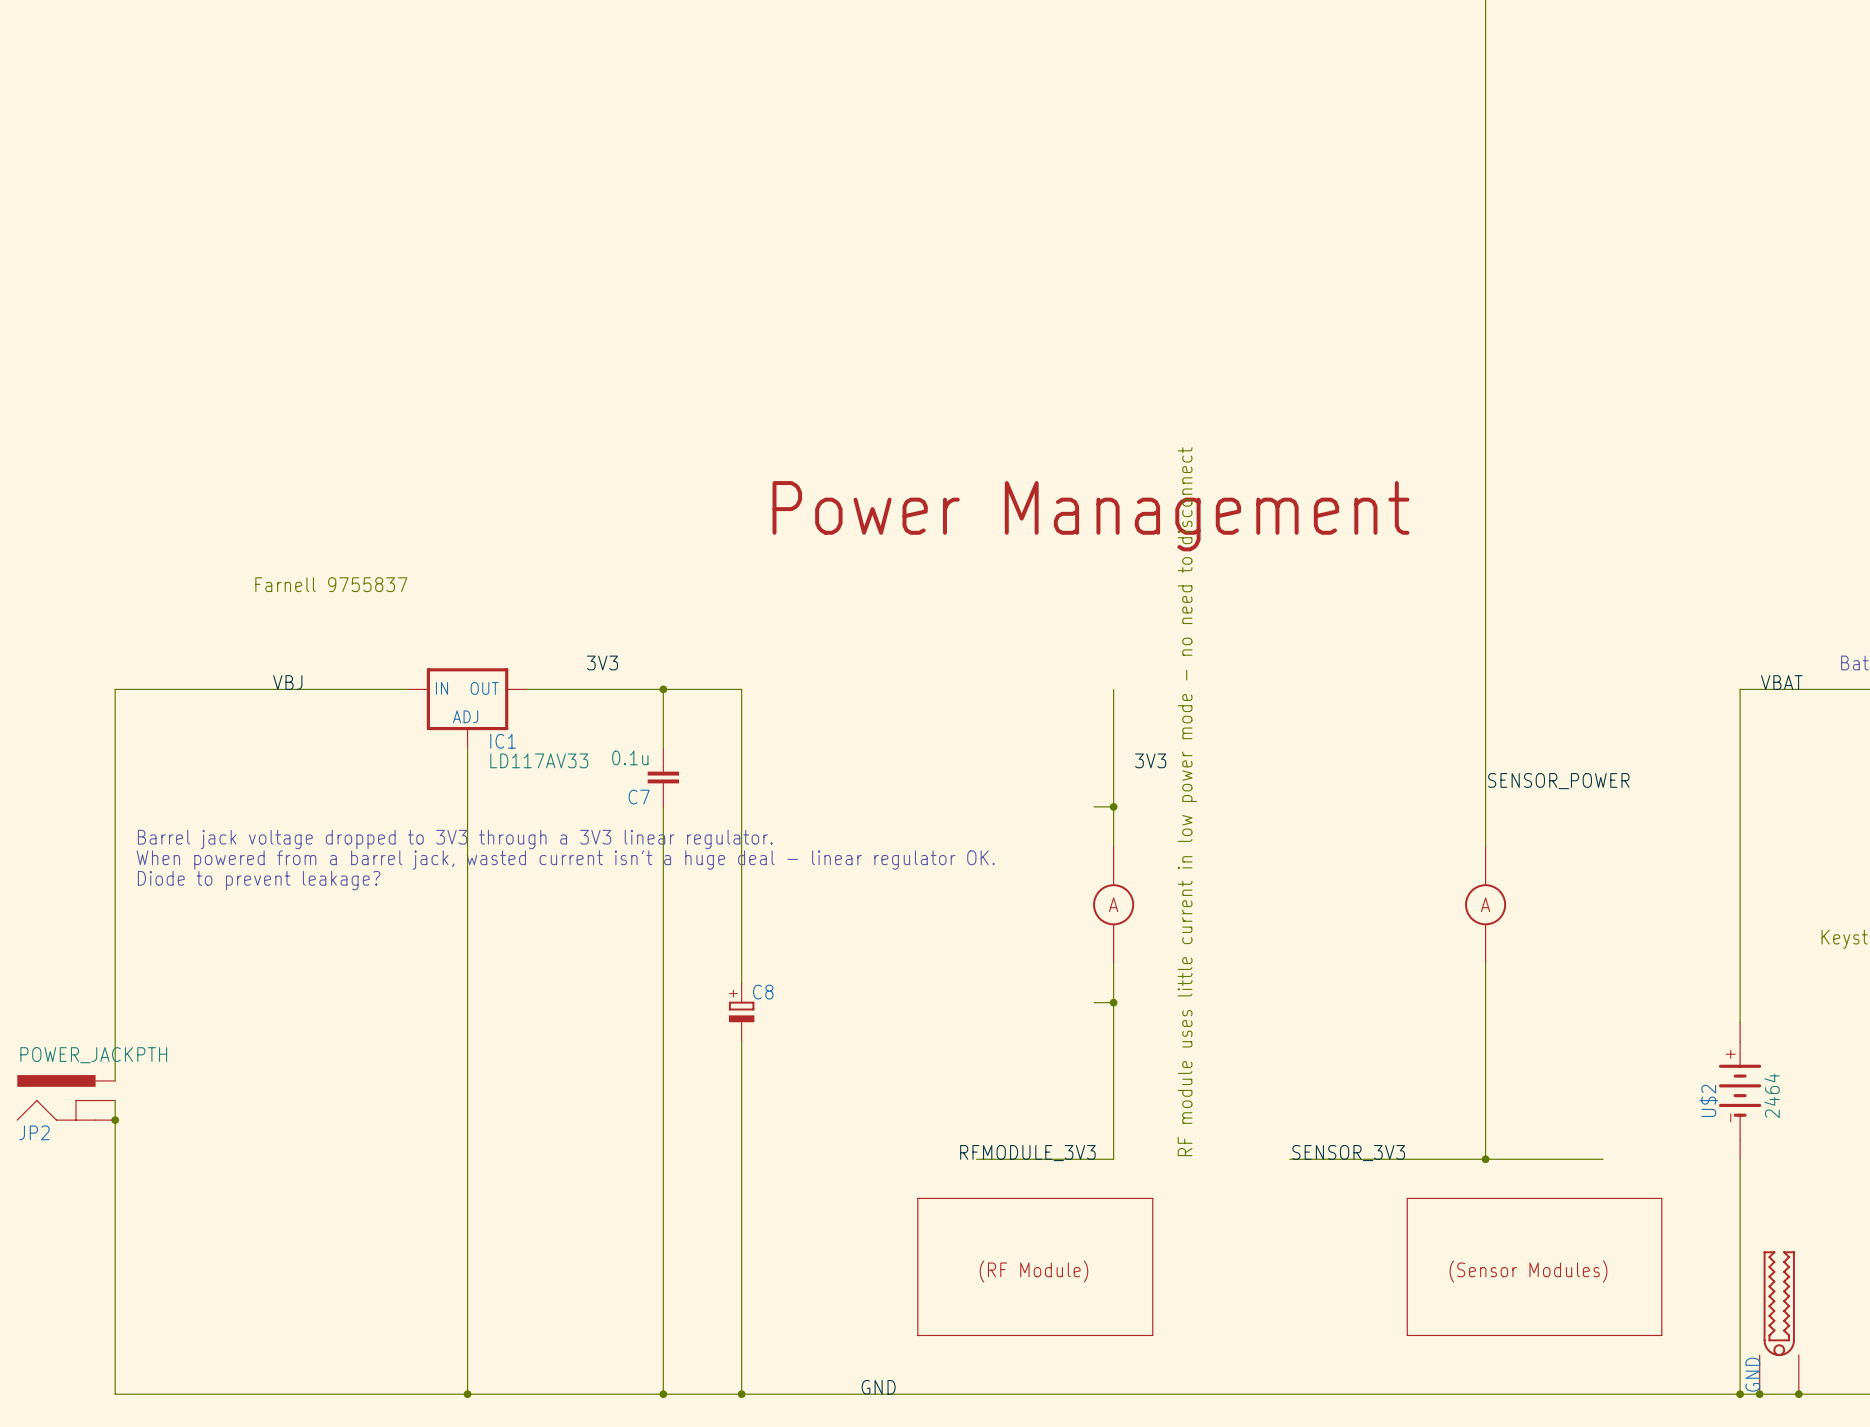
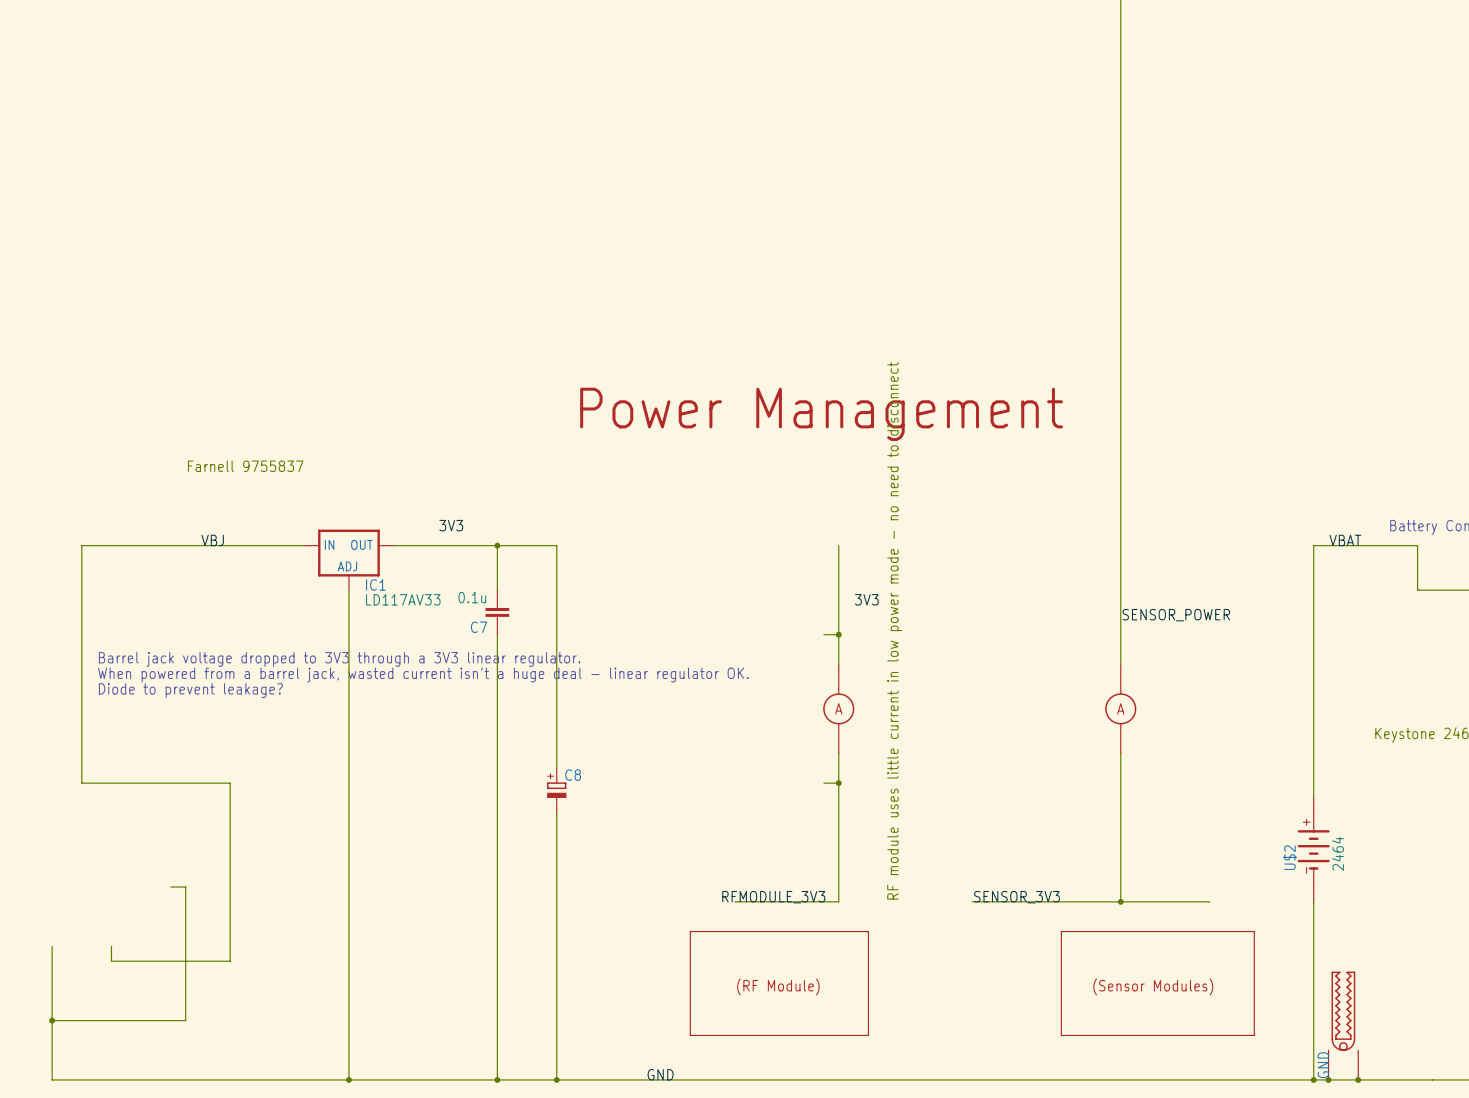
wire: (115, 1002) (115, 1080) -> (81, 783) (230, 783) (230, 961) (111, 961) (111, 946)
JP2: POWER_JACKPTH (65, 1097) -> none
wire: (115, 1100) (115, 1394) -> (52, 946) (52, 1079) (81, 1079)
junction: (115, 1120) -> none
wire: none -> (170, 887) (185, 887) (185, 1020) (52, 1020)
junction: none -> (52, 1020)

